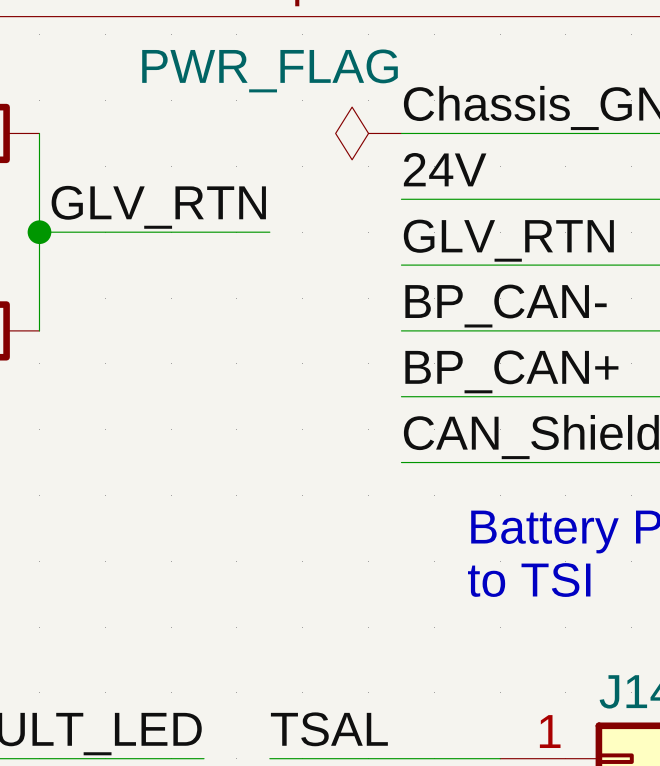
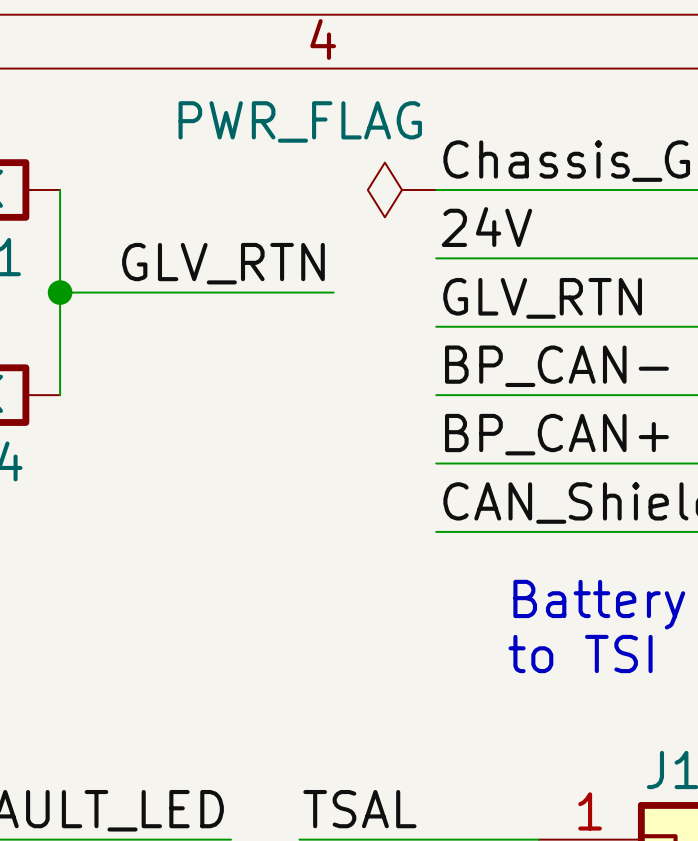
label position: GLV_RTN (158, 207) -> GLV_RTN (223, 263)
wire: none -> (299, 292) (333, 292)

